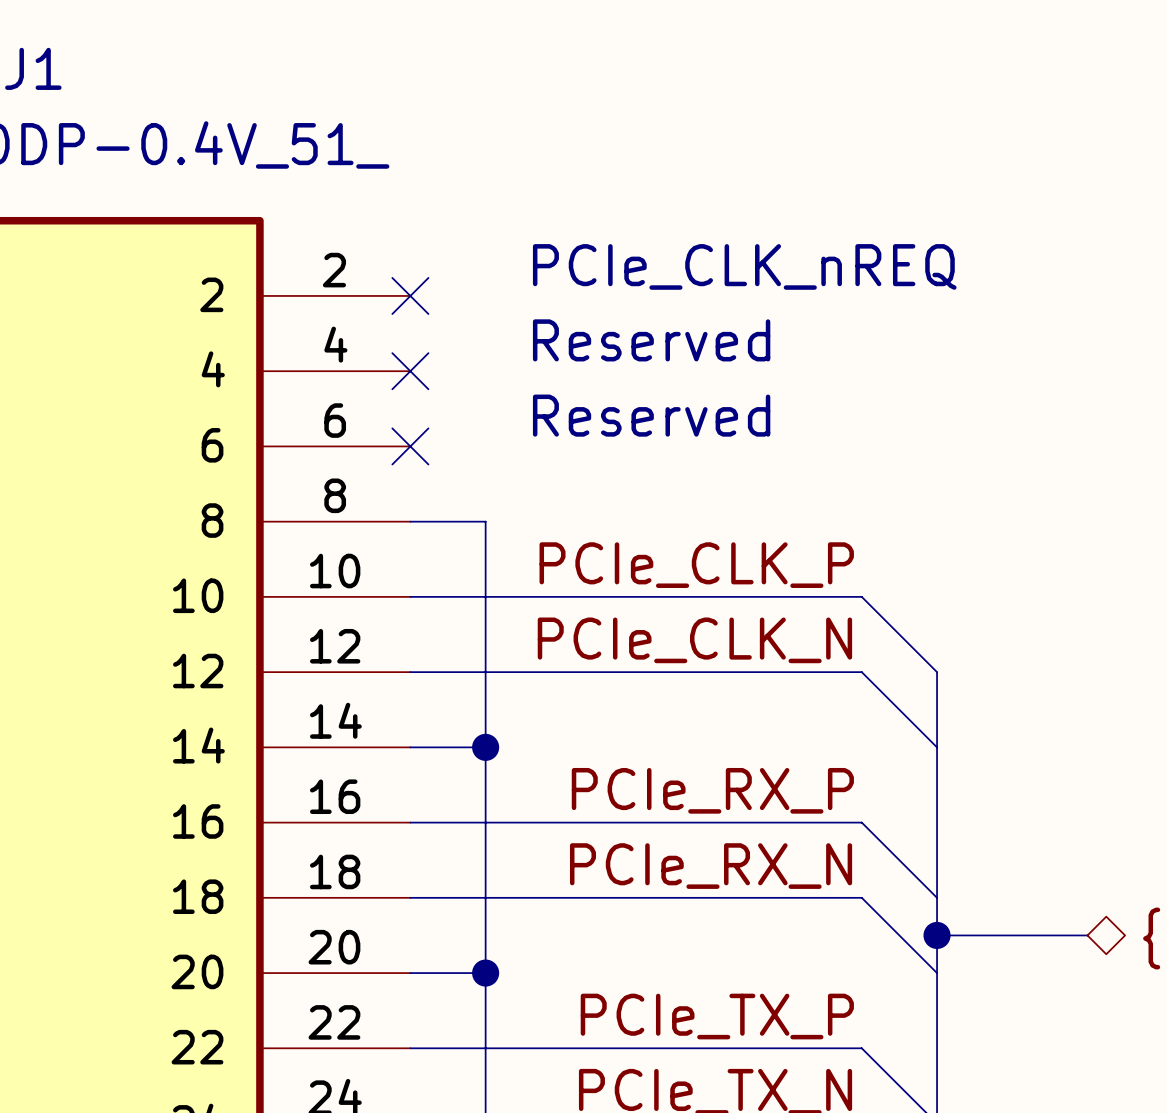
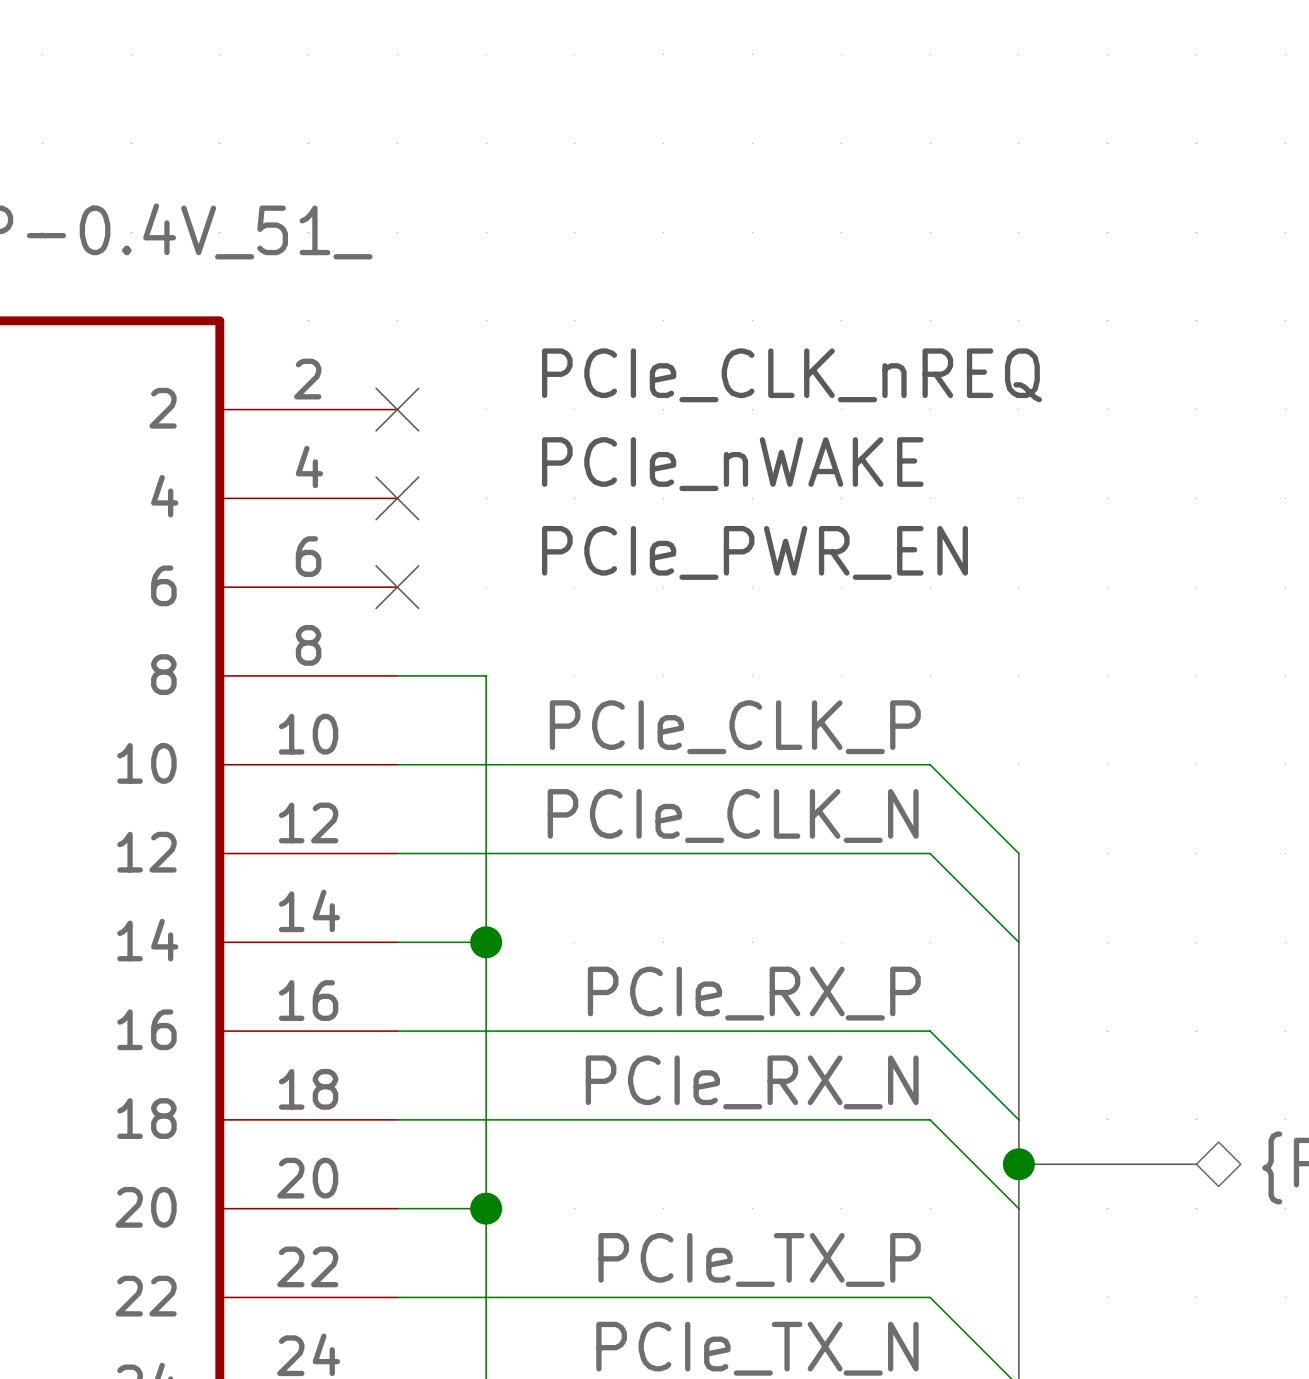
text: Reserved (651, 340) -> PCIe_nWAKE (732, 464)
text: Reserved (651, 415) -> PCIe_PWR_EN (754, 552)

